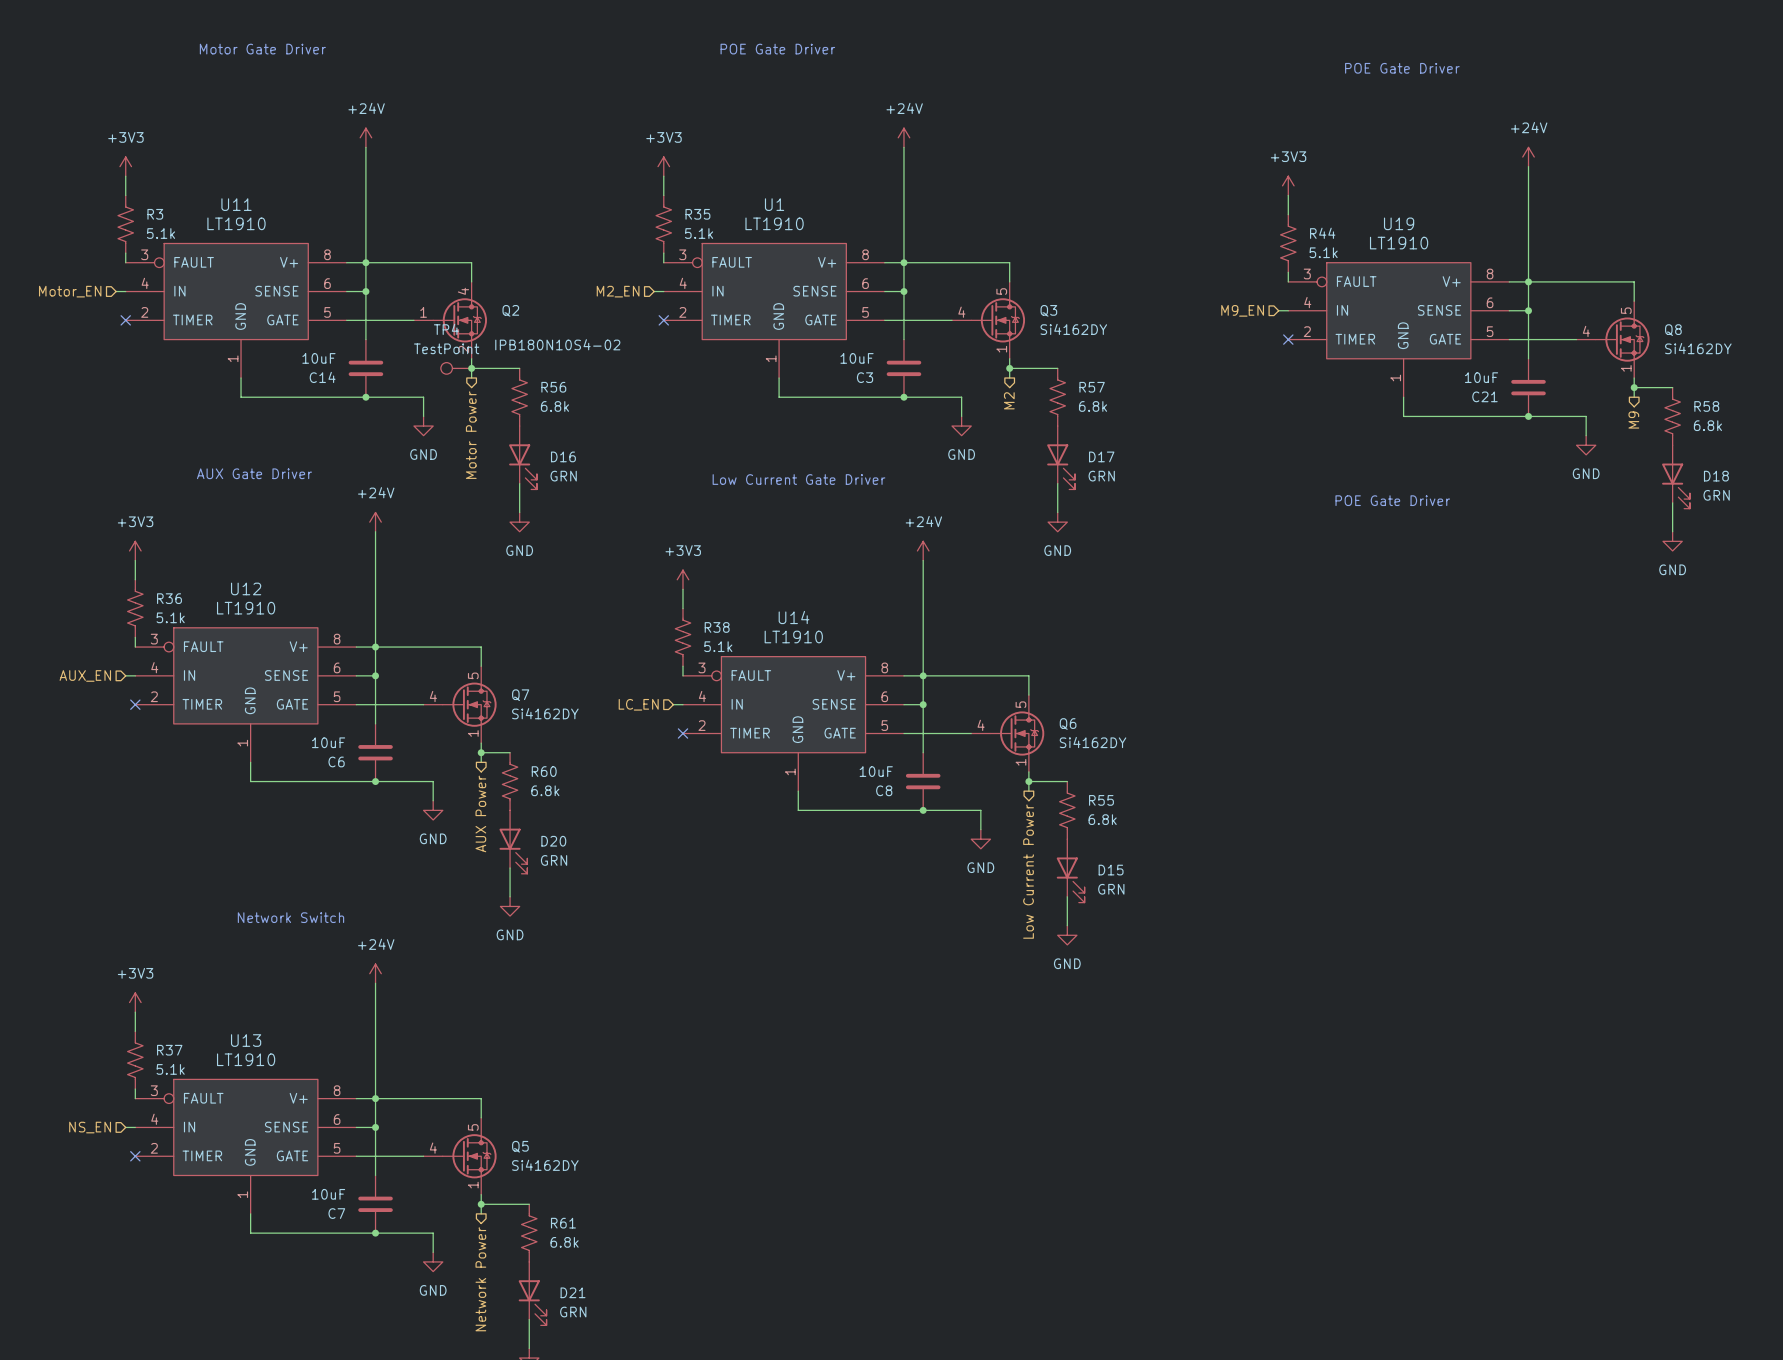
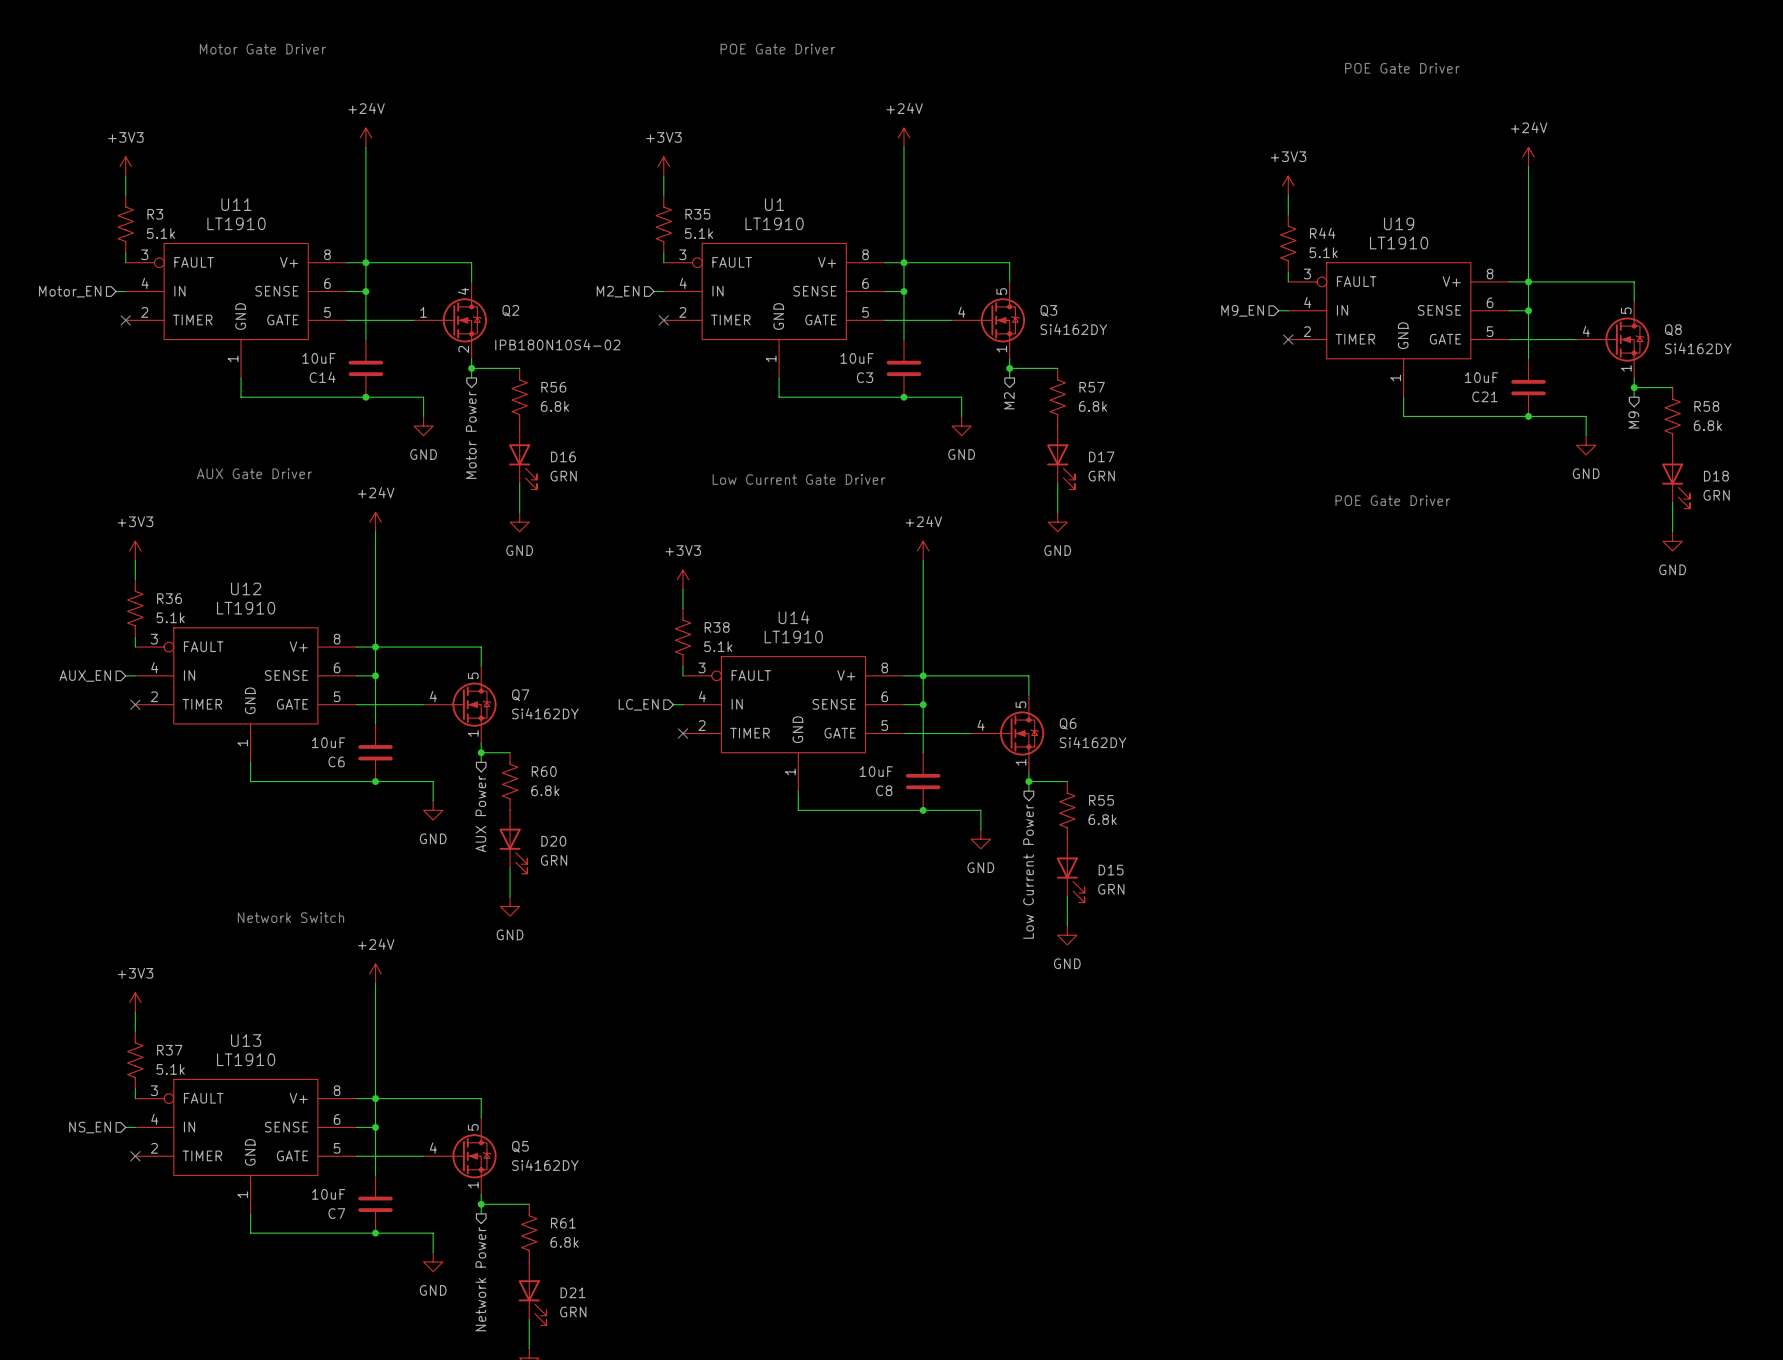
TP4: TestPoint (456, 368) -> none

